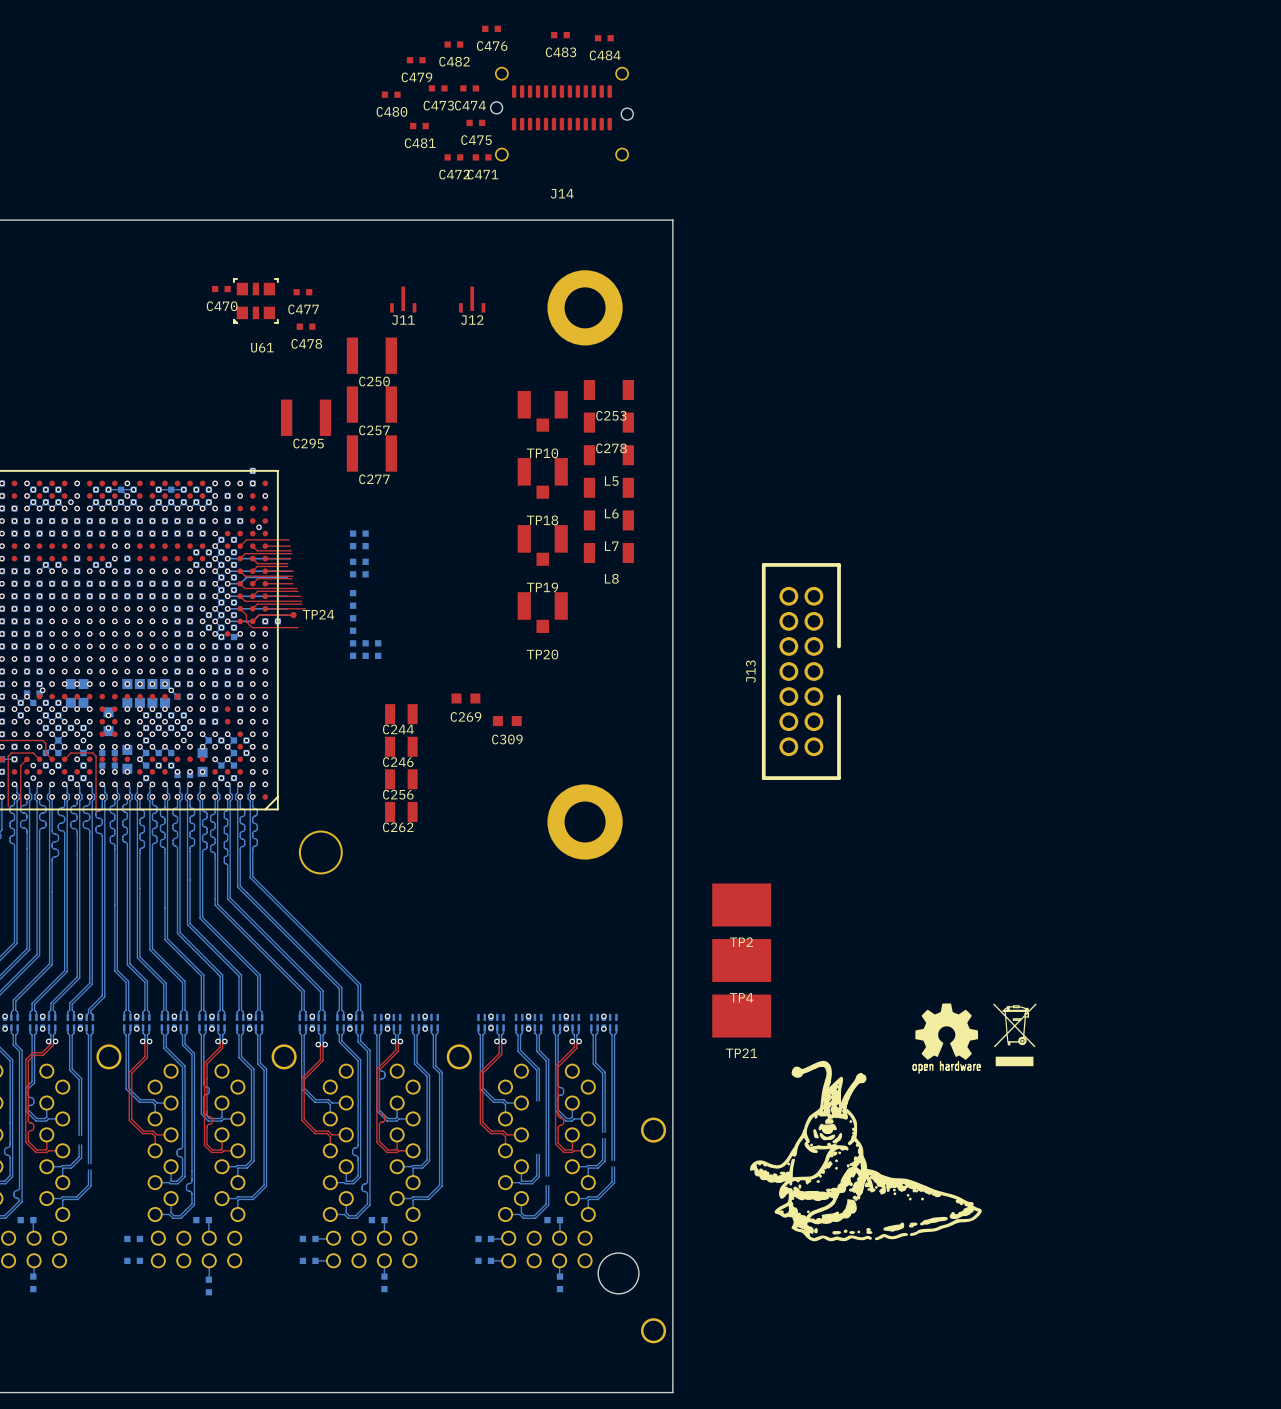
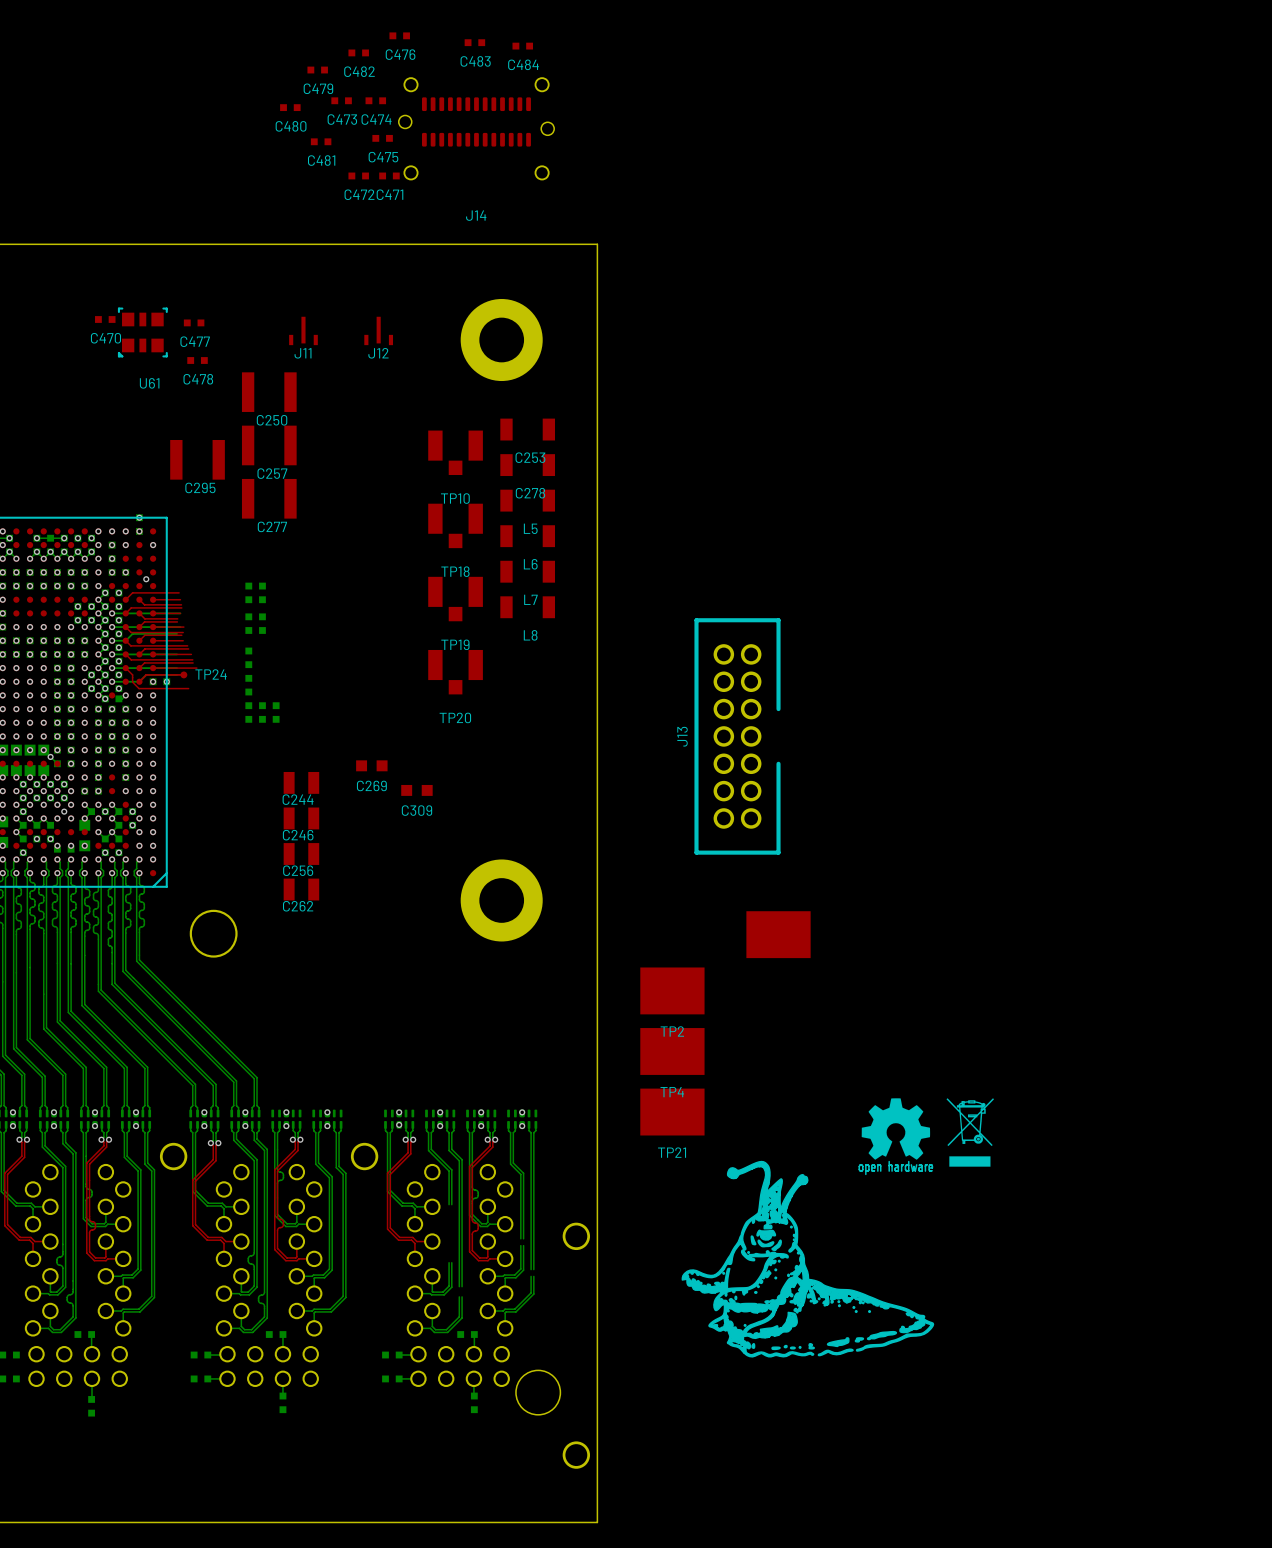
part: none -> (778, 934)

